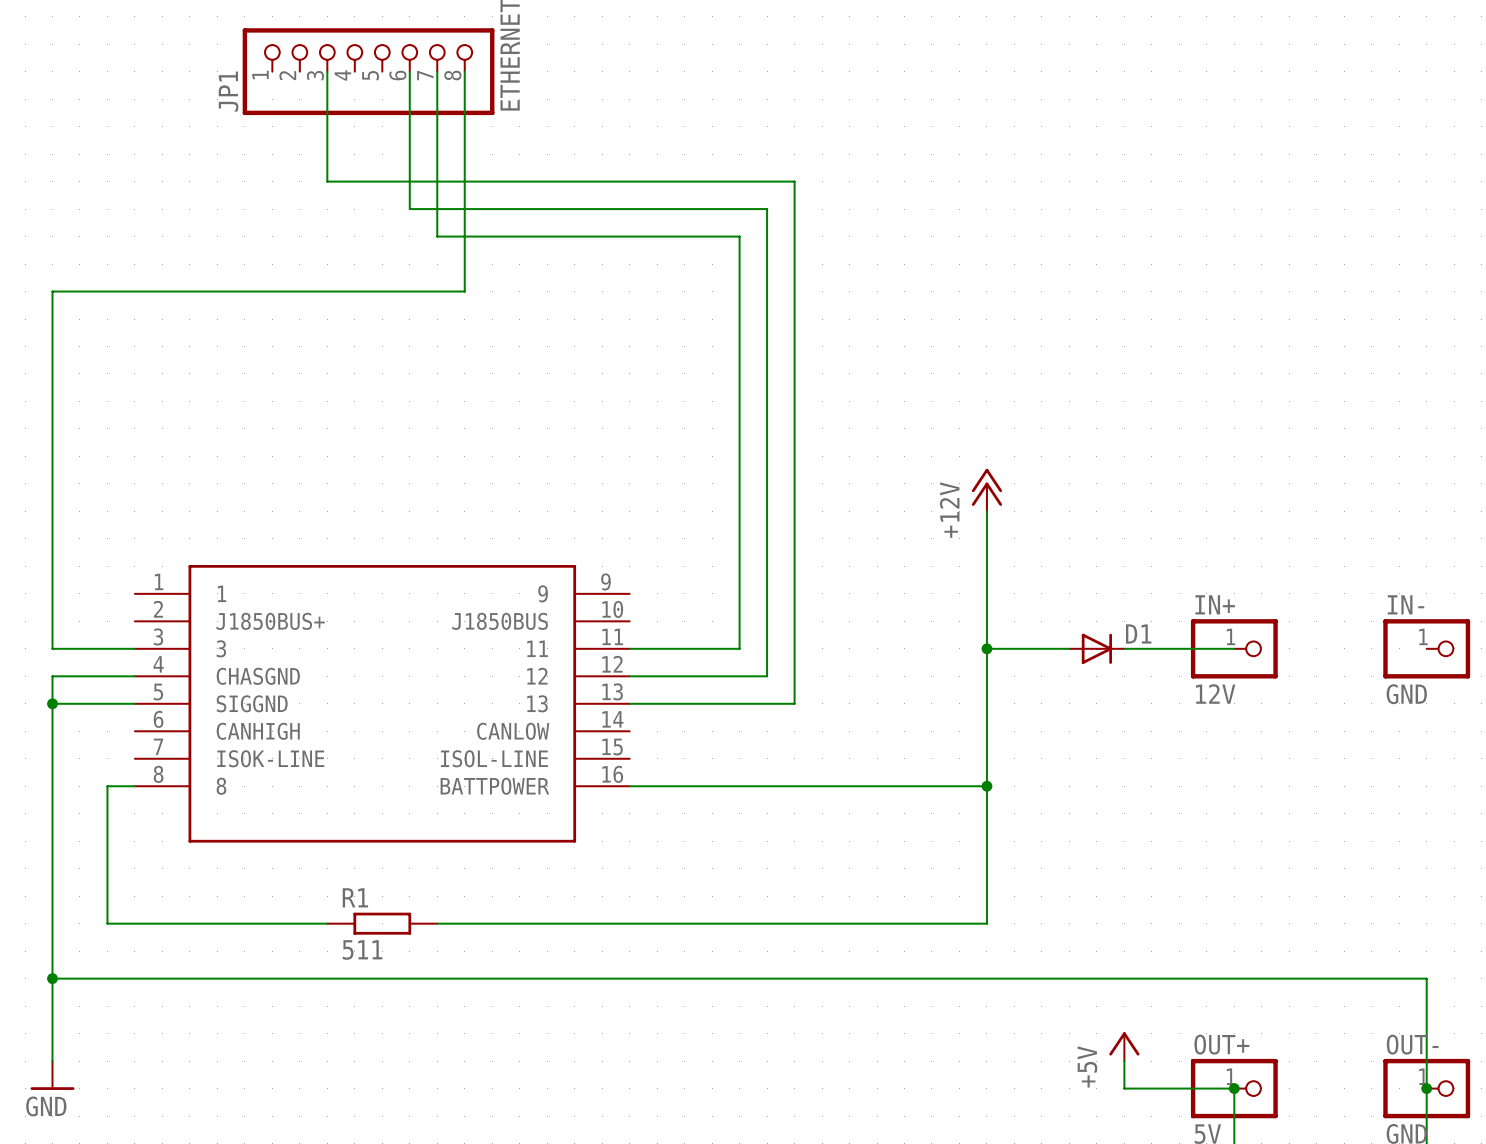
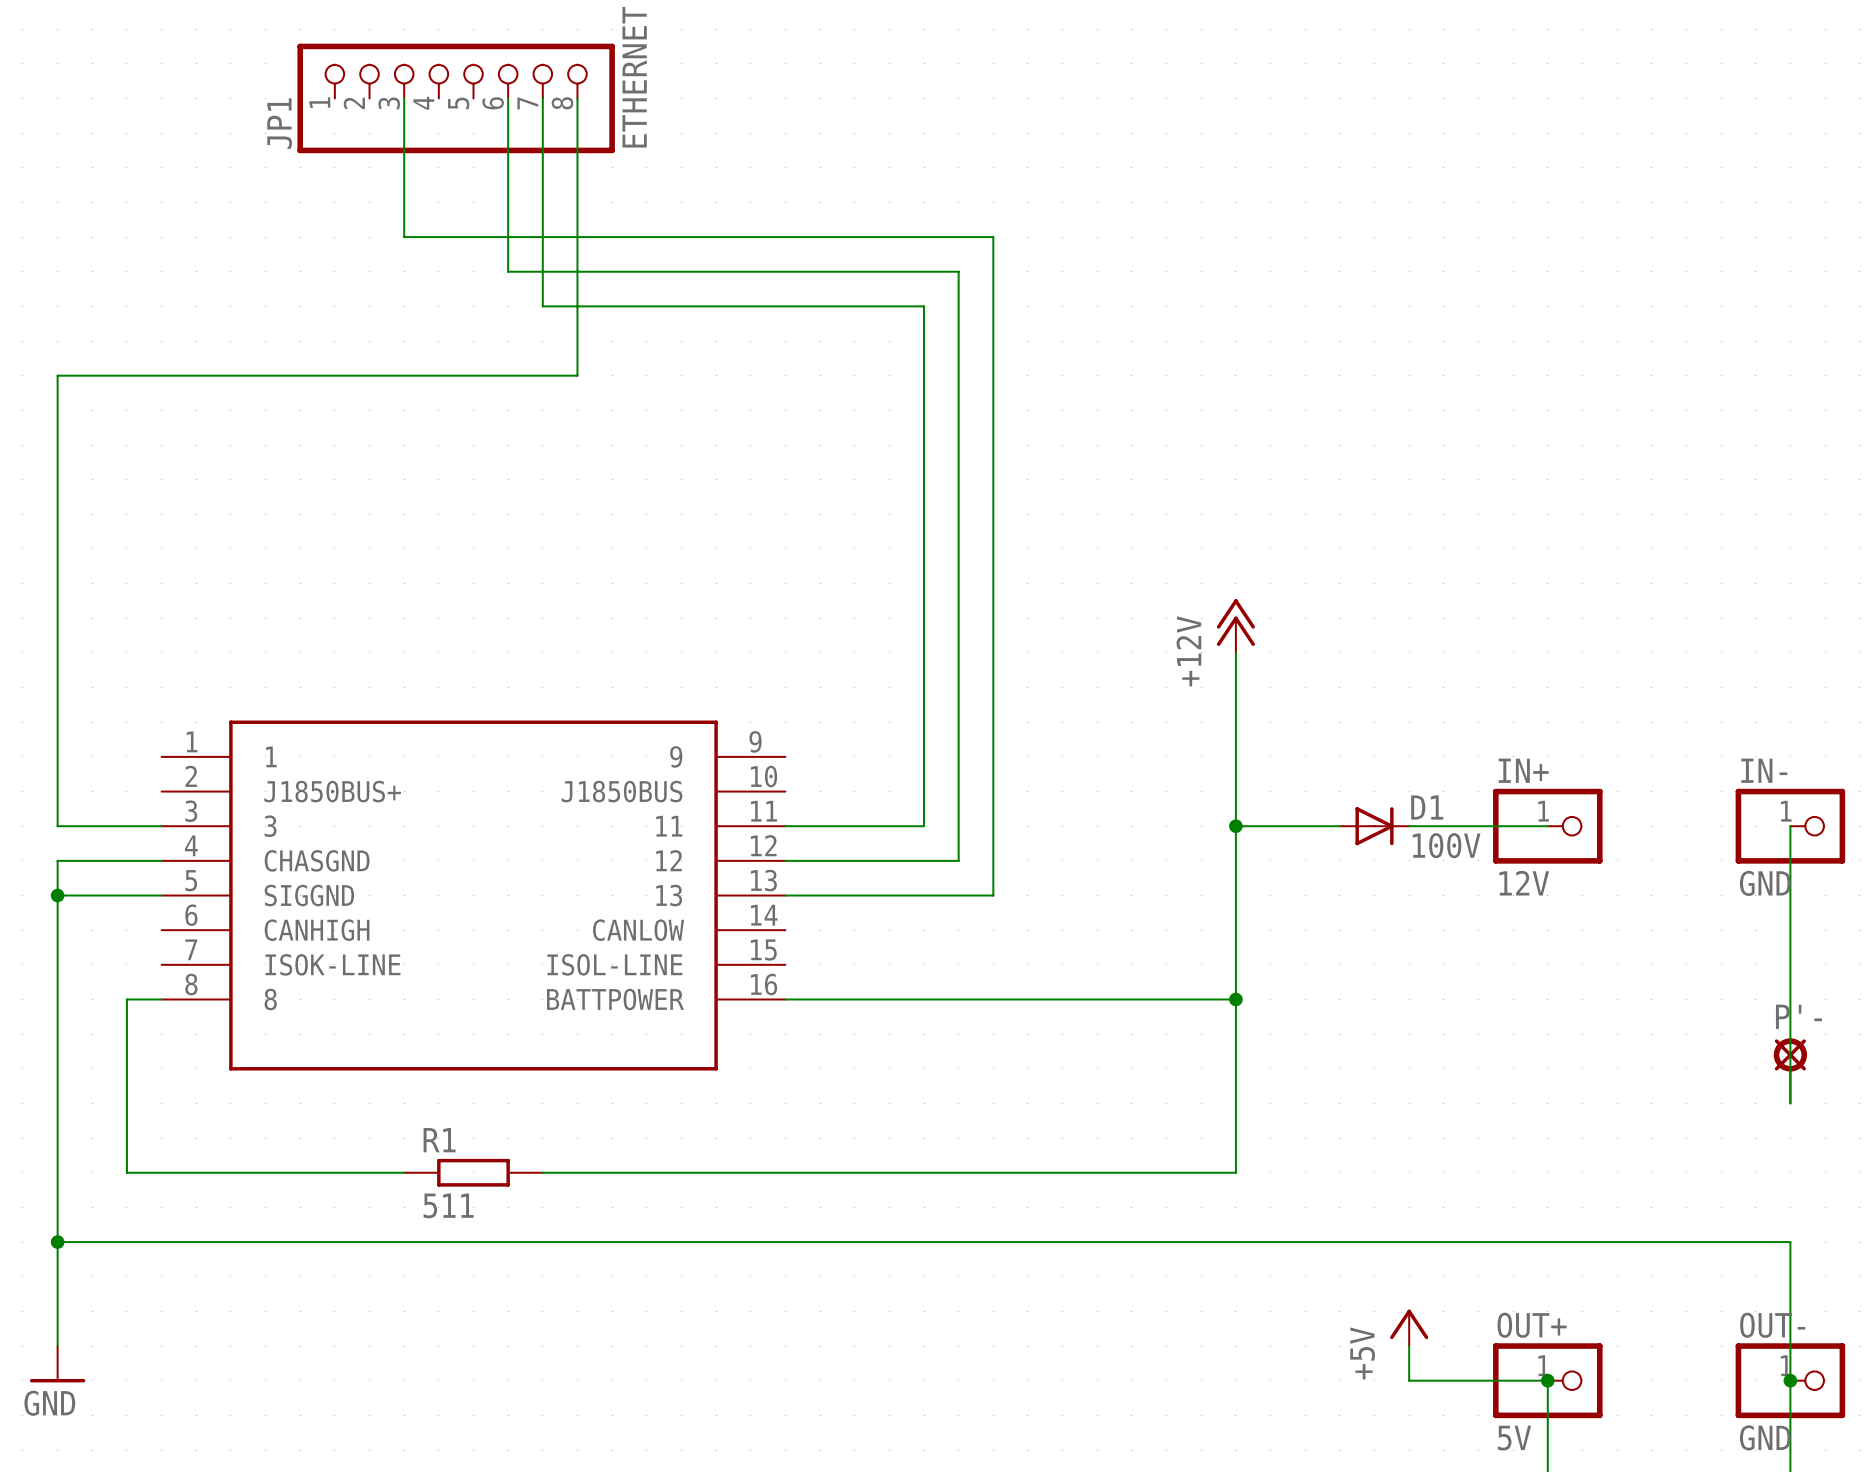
wire: none -> (1790, 826) (1790, 1103)
D1 value: none -> 100V (1446, 845)
P'-: none -> (1790, 1070)

